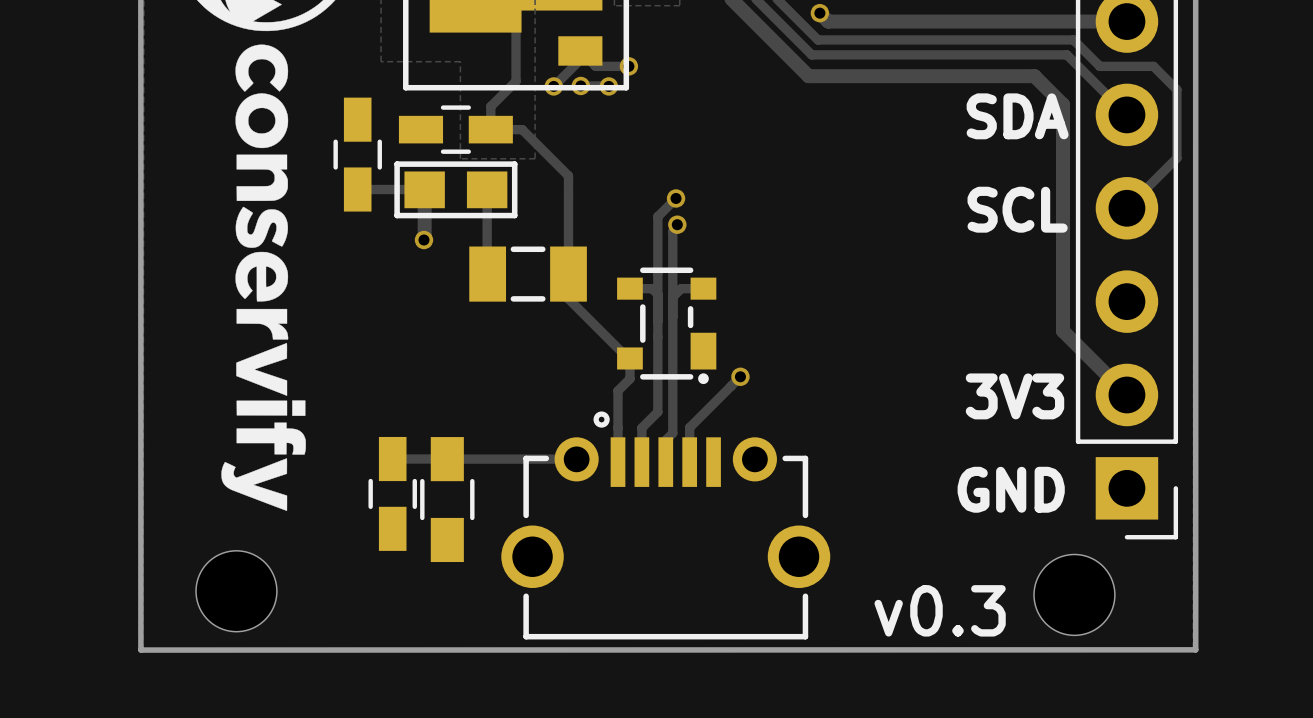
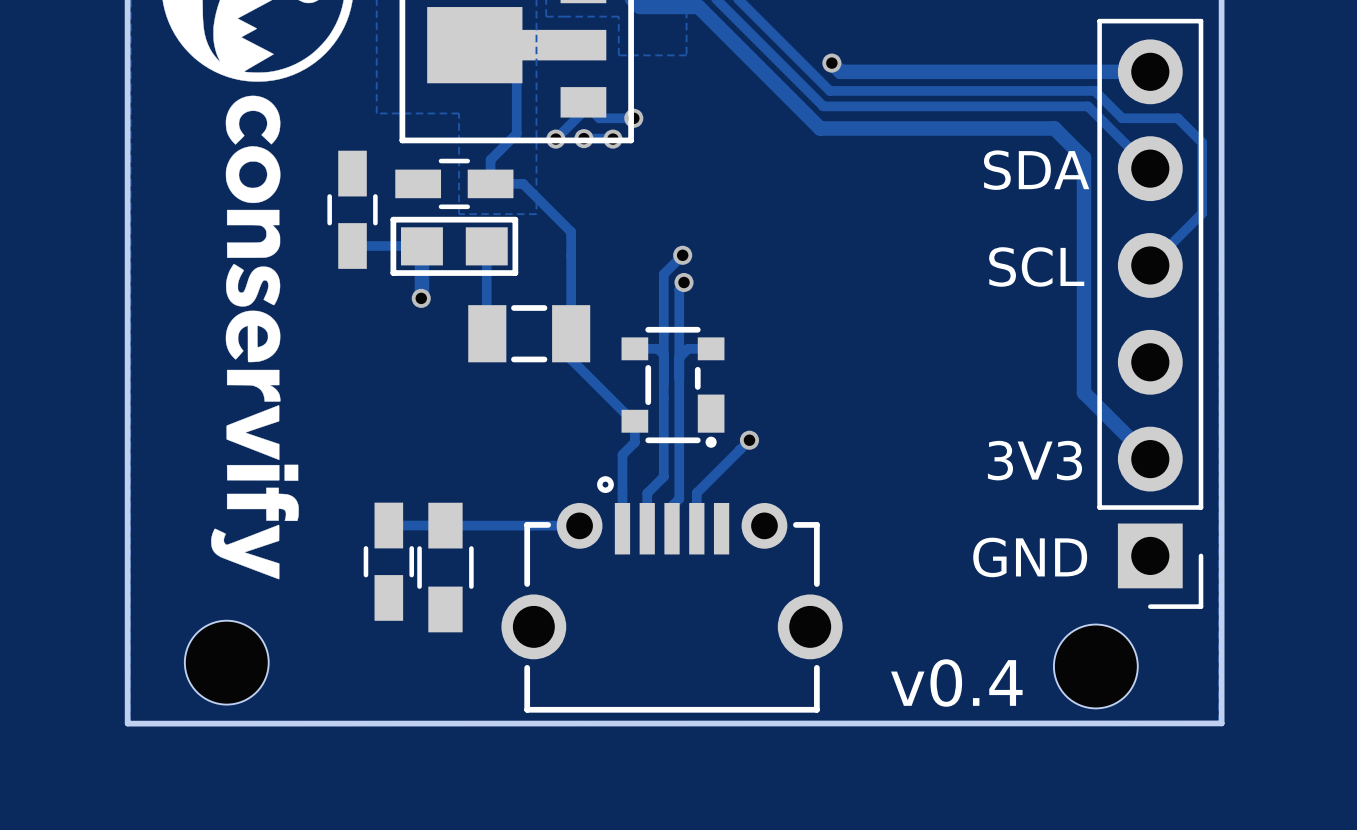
text: v0.3 (940, 610) -> v0.4 (956, 683)

